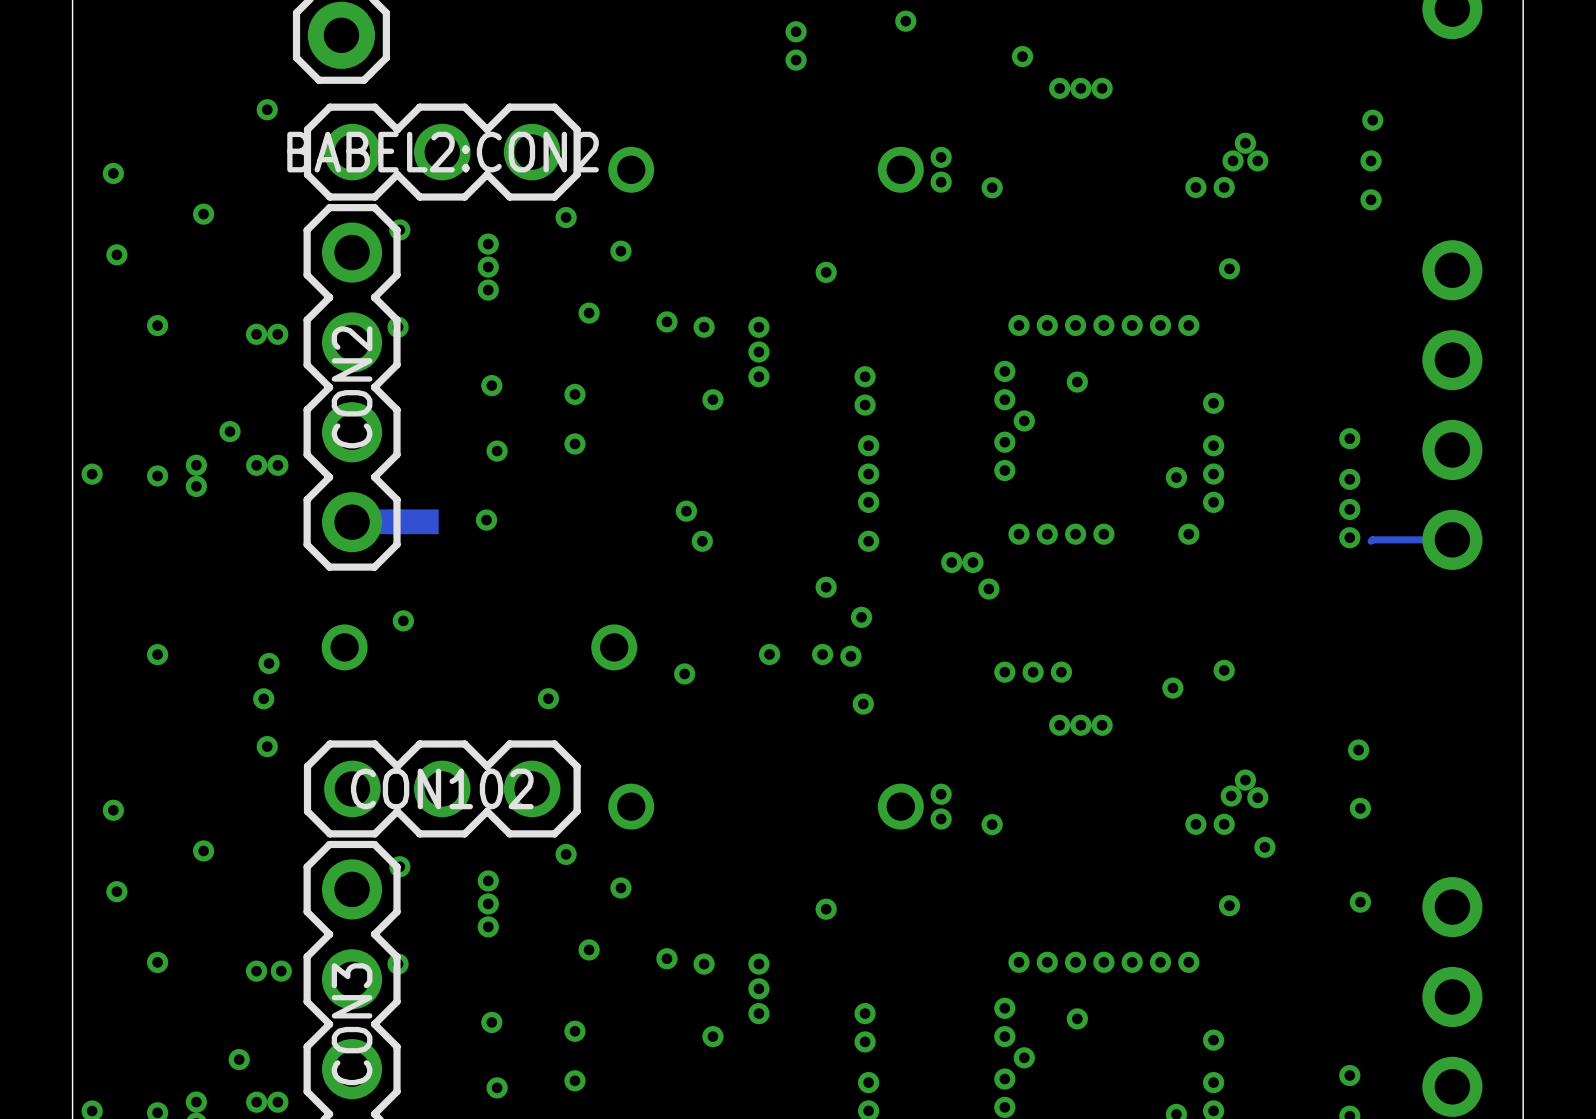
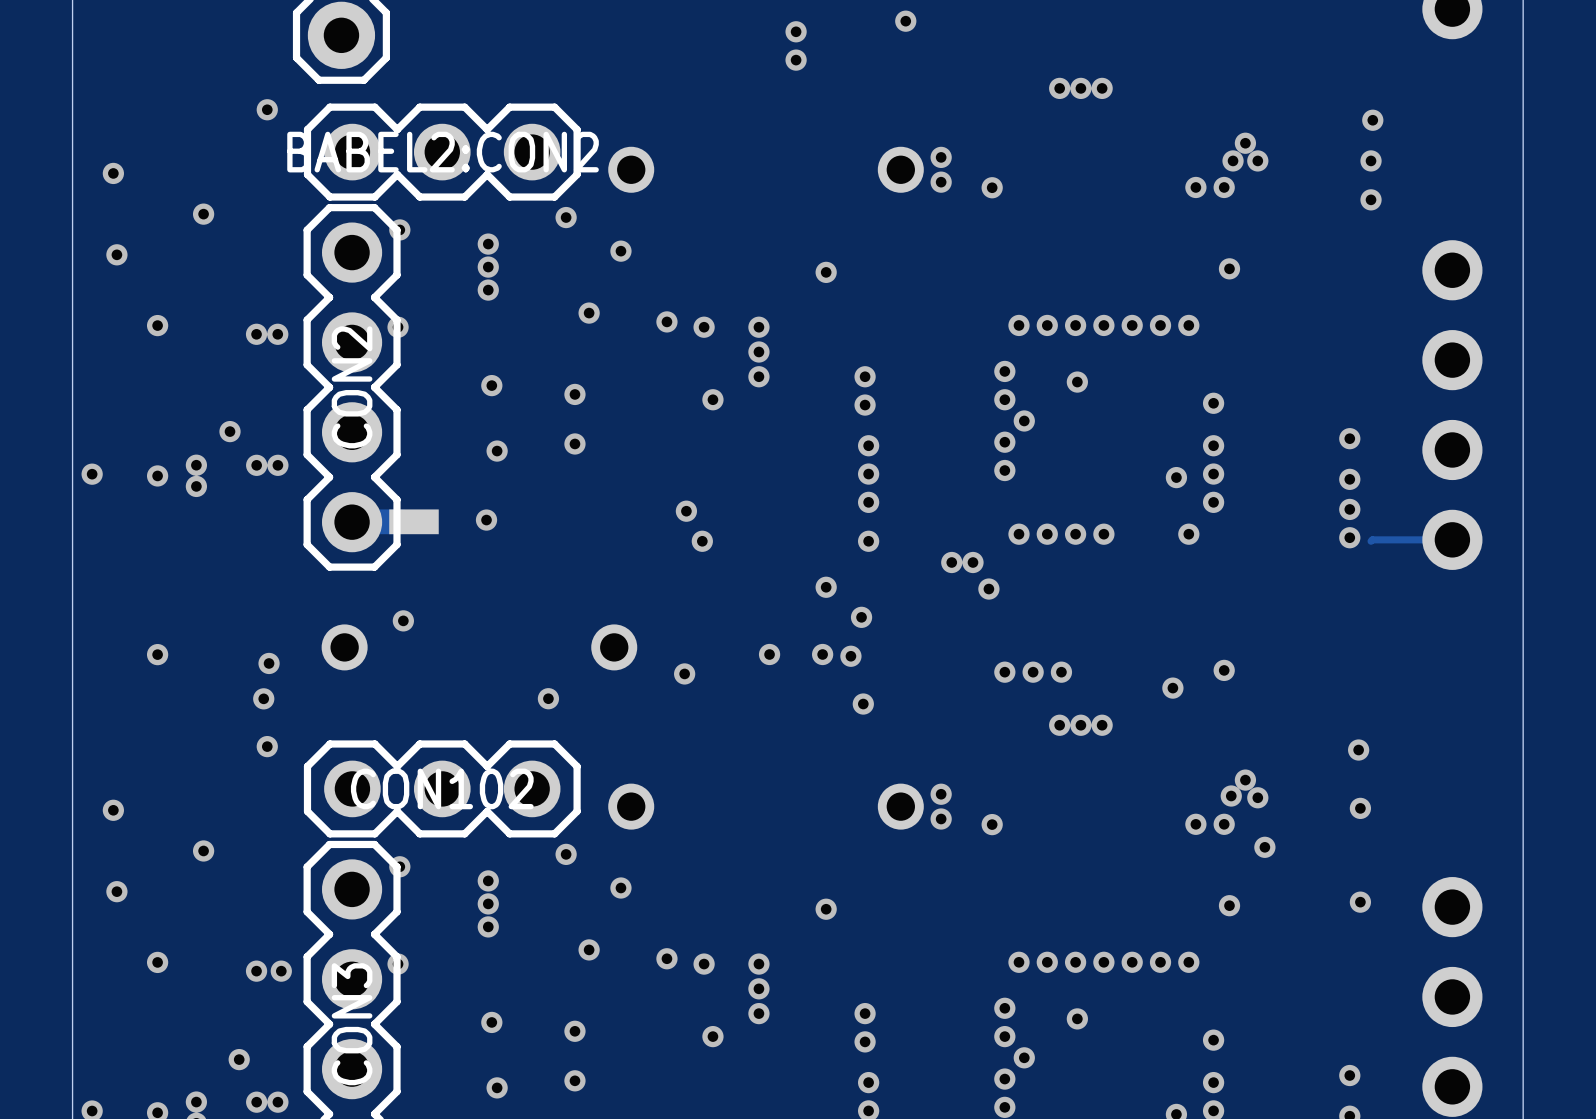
via: (1022, 56) -> none

